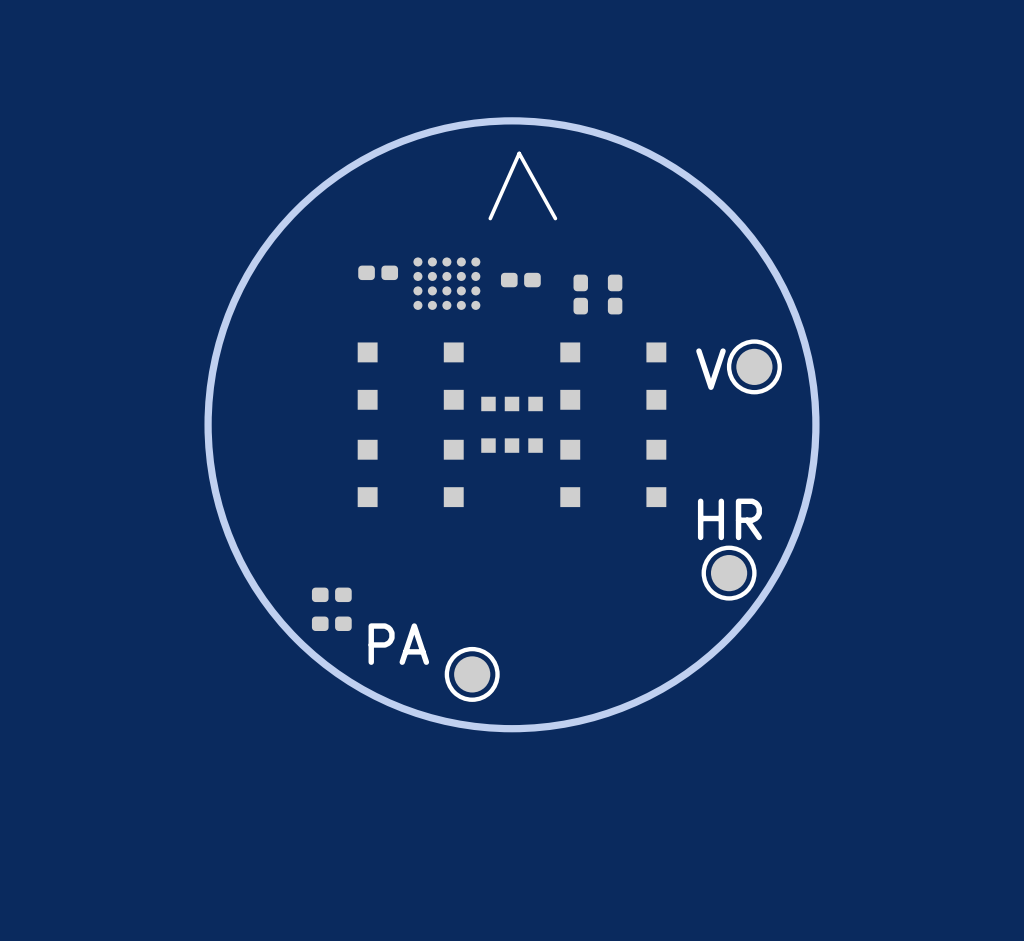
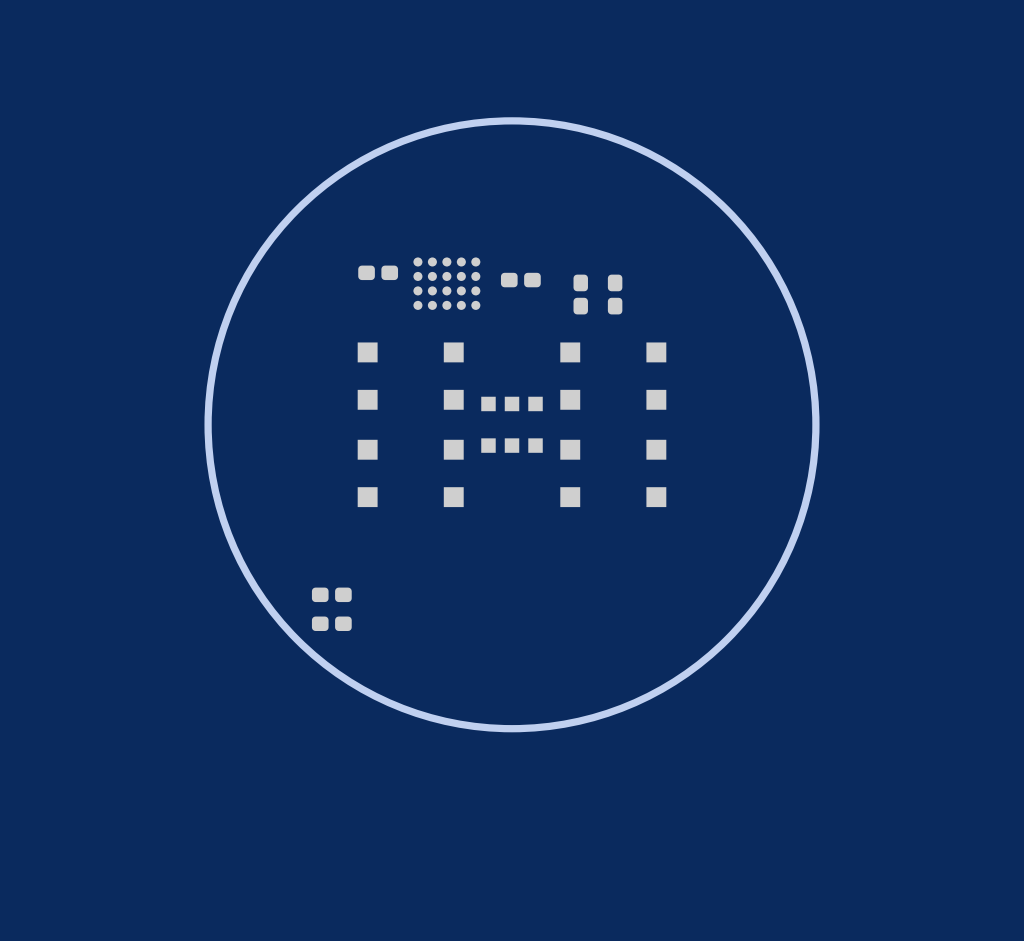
line: (555, 218) (519, 153) (490, 218) -> none
V: (754, 366) -> none
HR: (729, 573) -> none
PA: (472, 674) -> none

